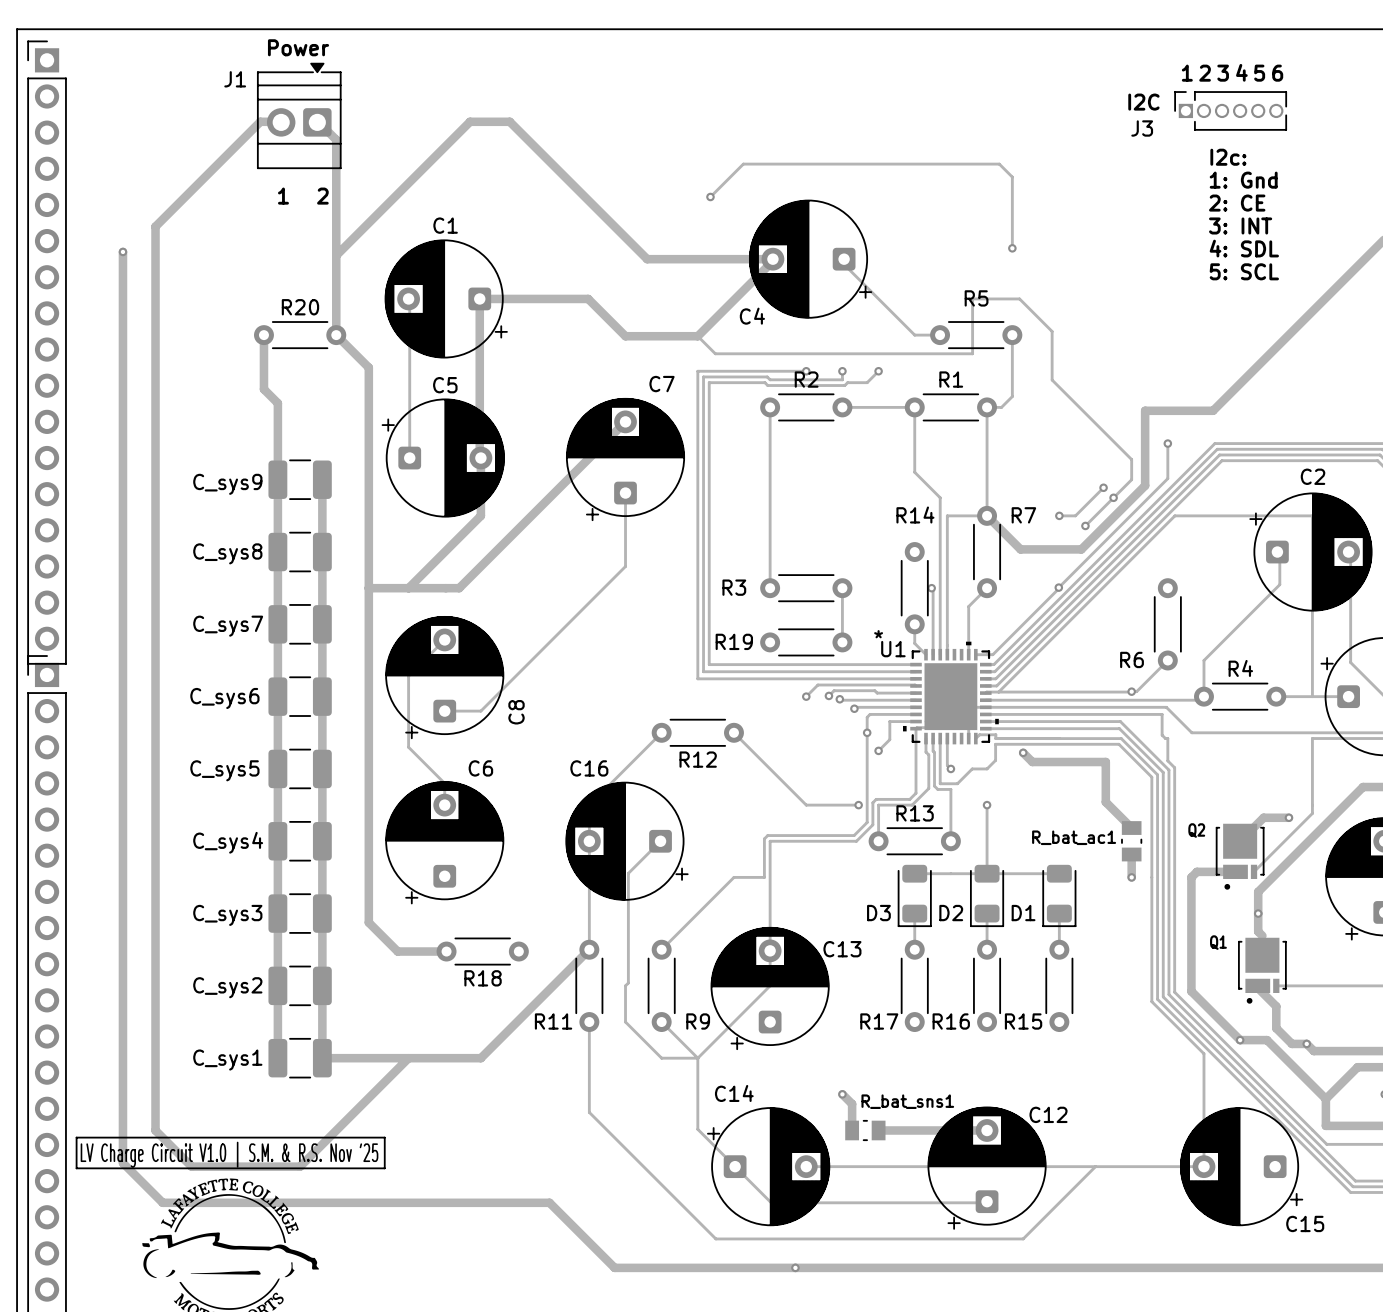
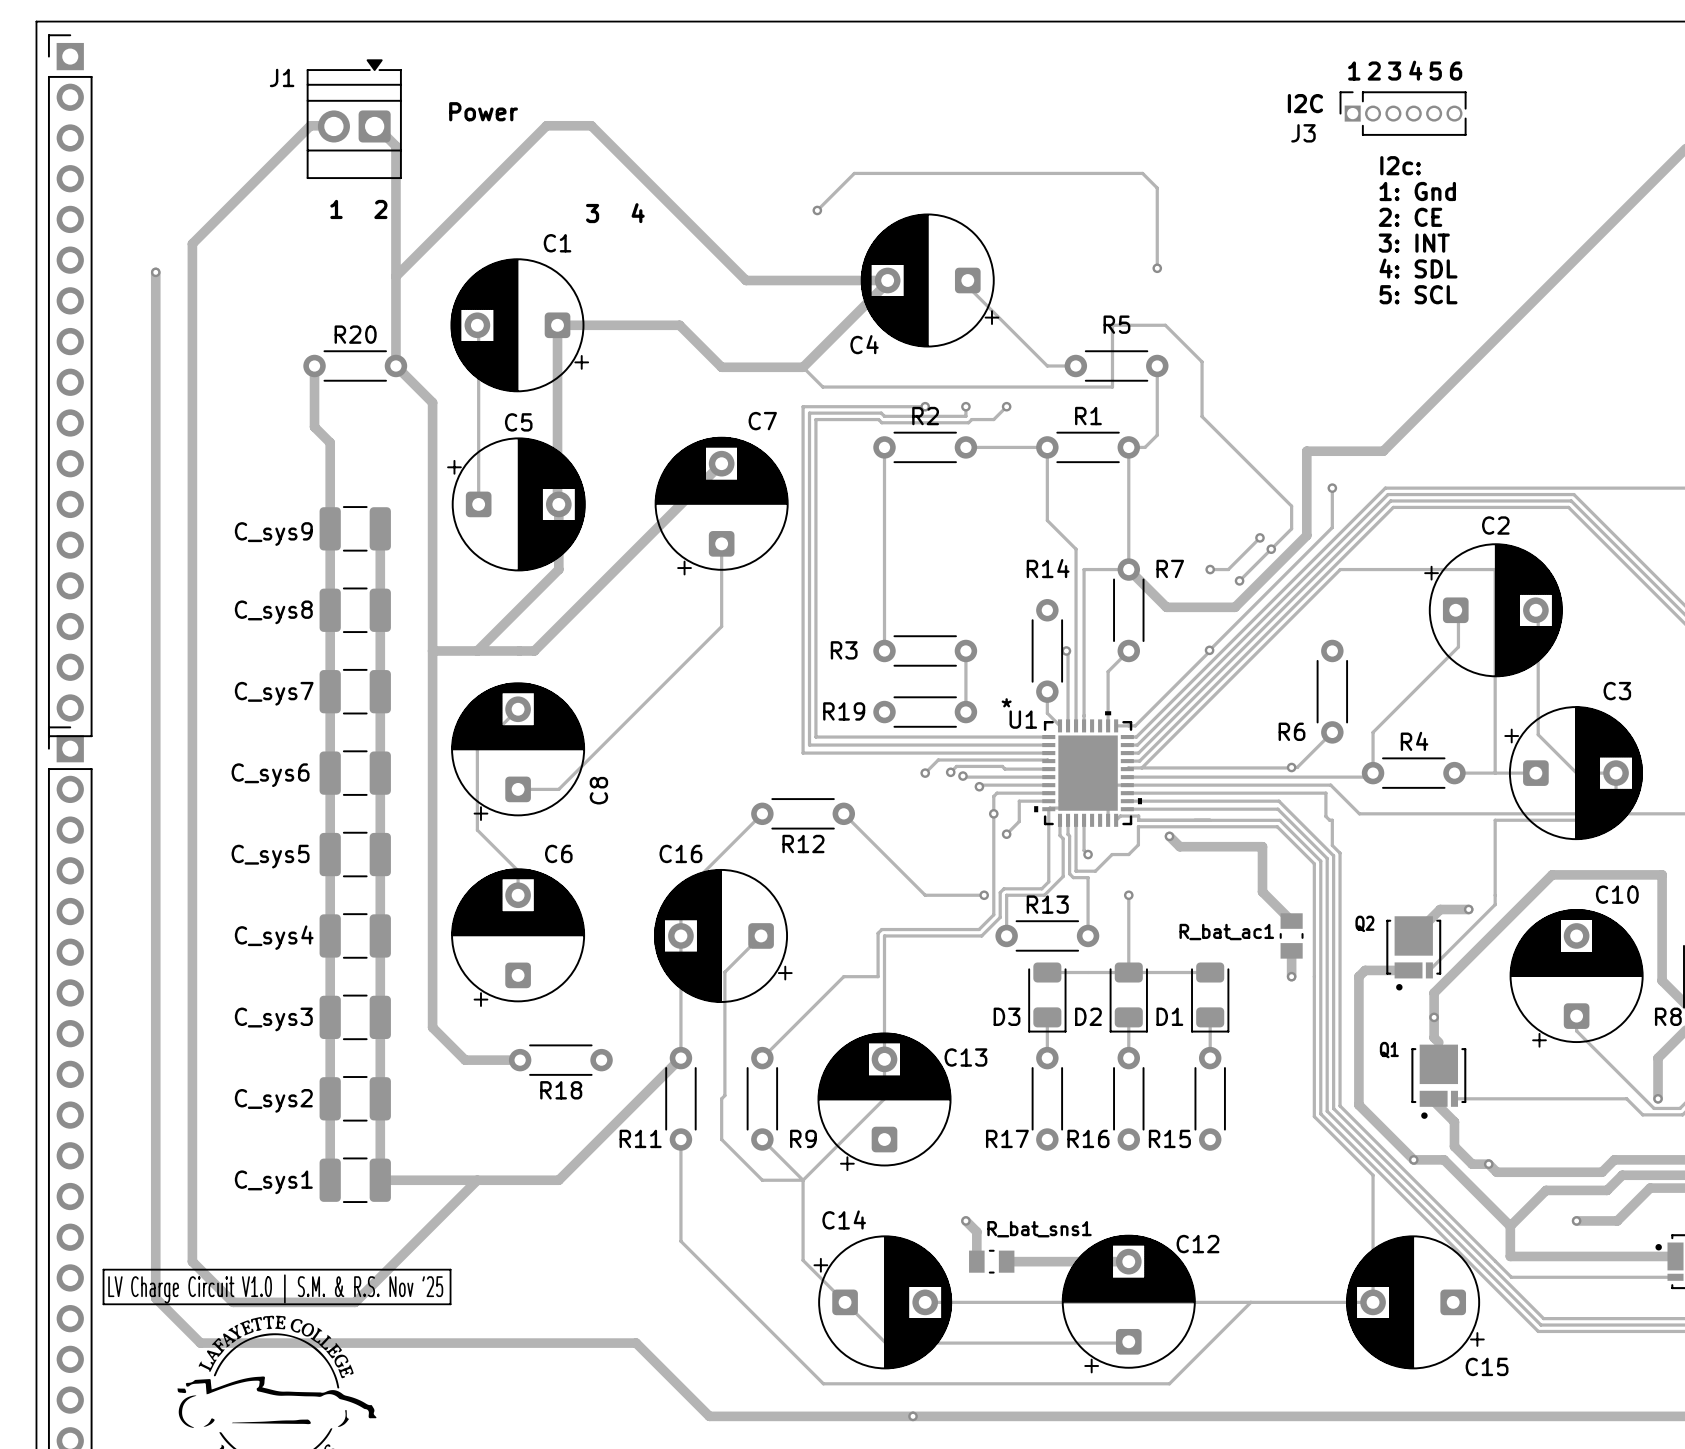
text position: Power (298, 47) -> Power (483, 111)
text: none -> 3 (592, 213)
text: none -> 4 (638, 213)
C1 name position: C1 (445, 225) -> C1 (557, 243)

